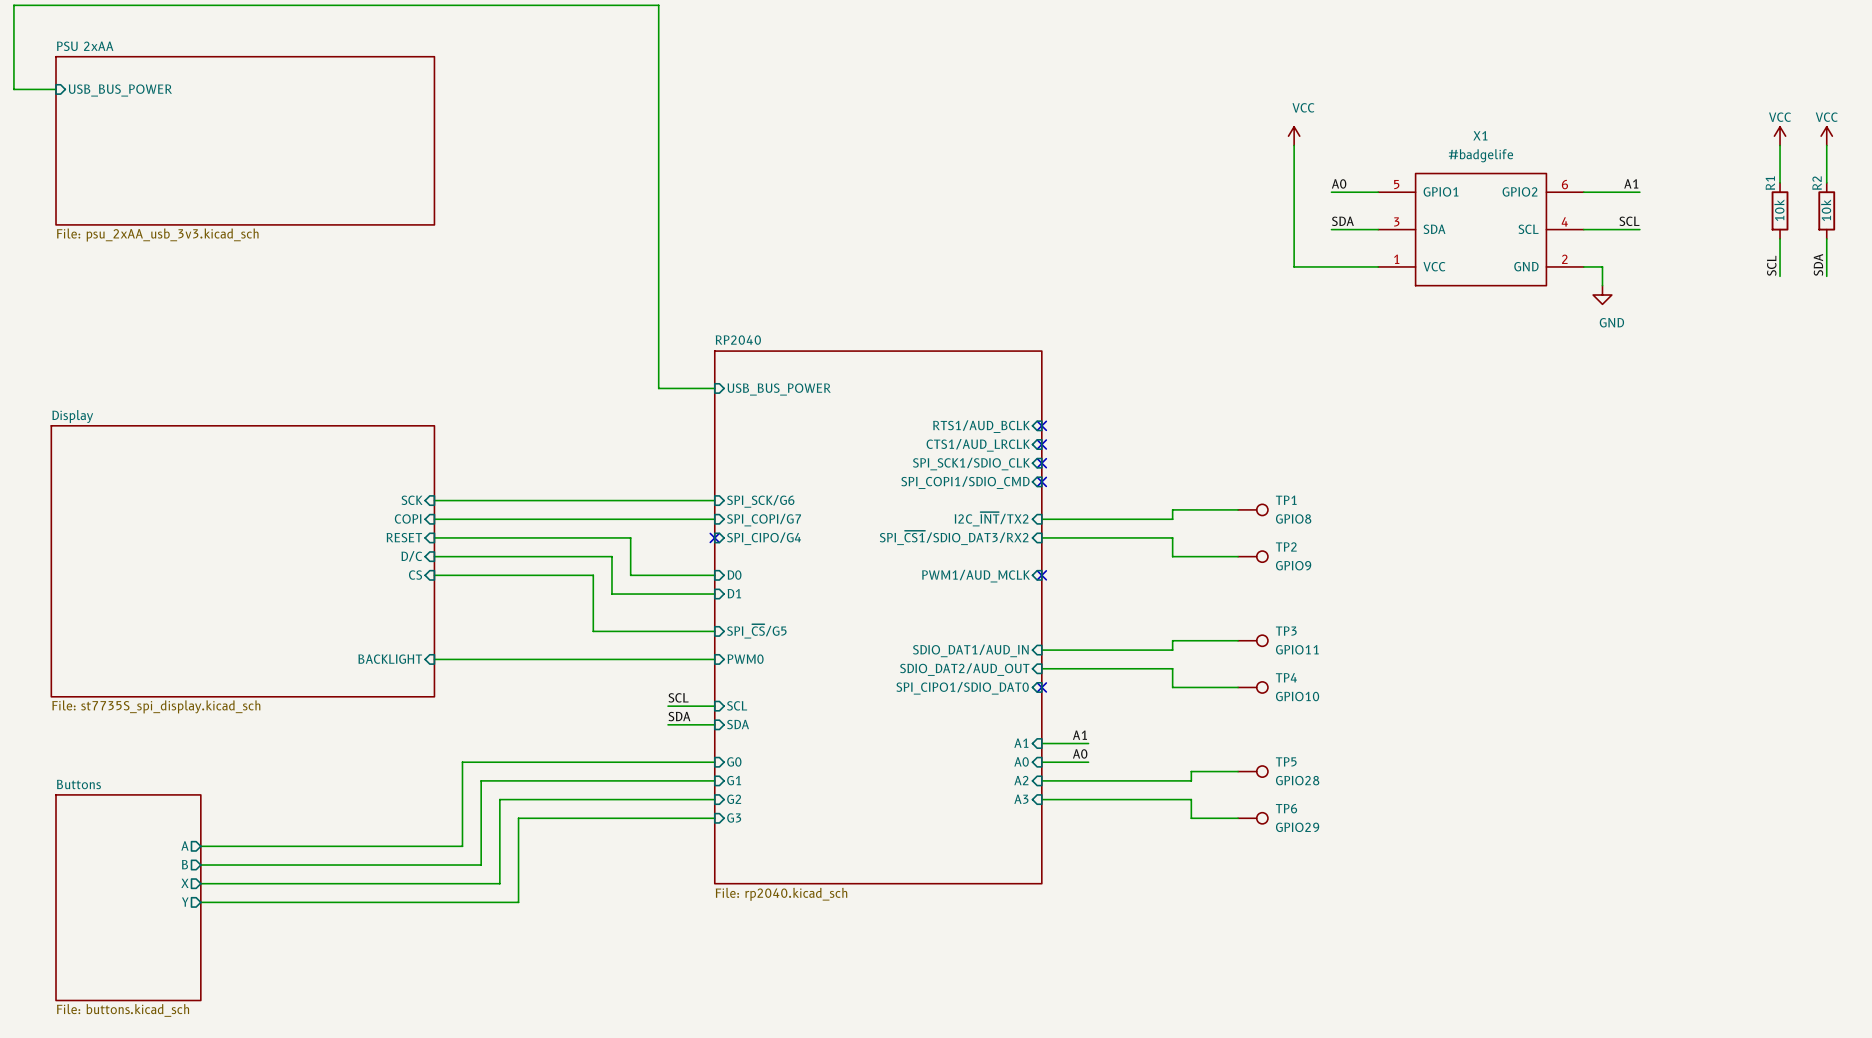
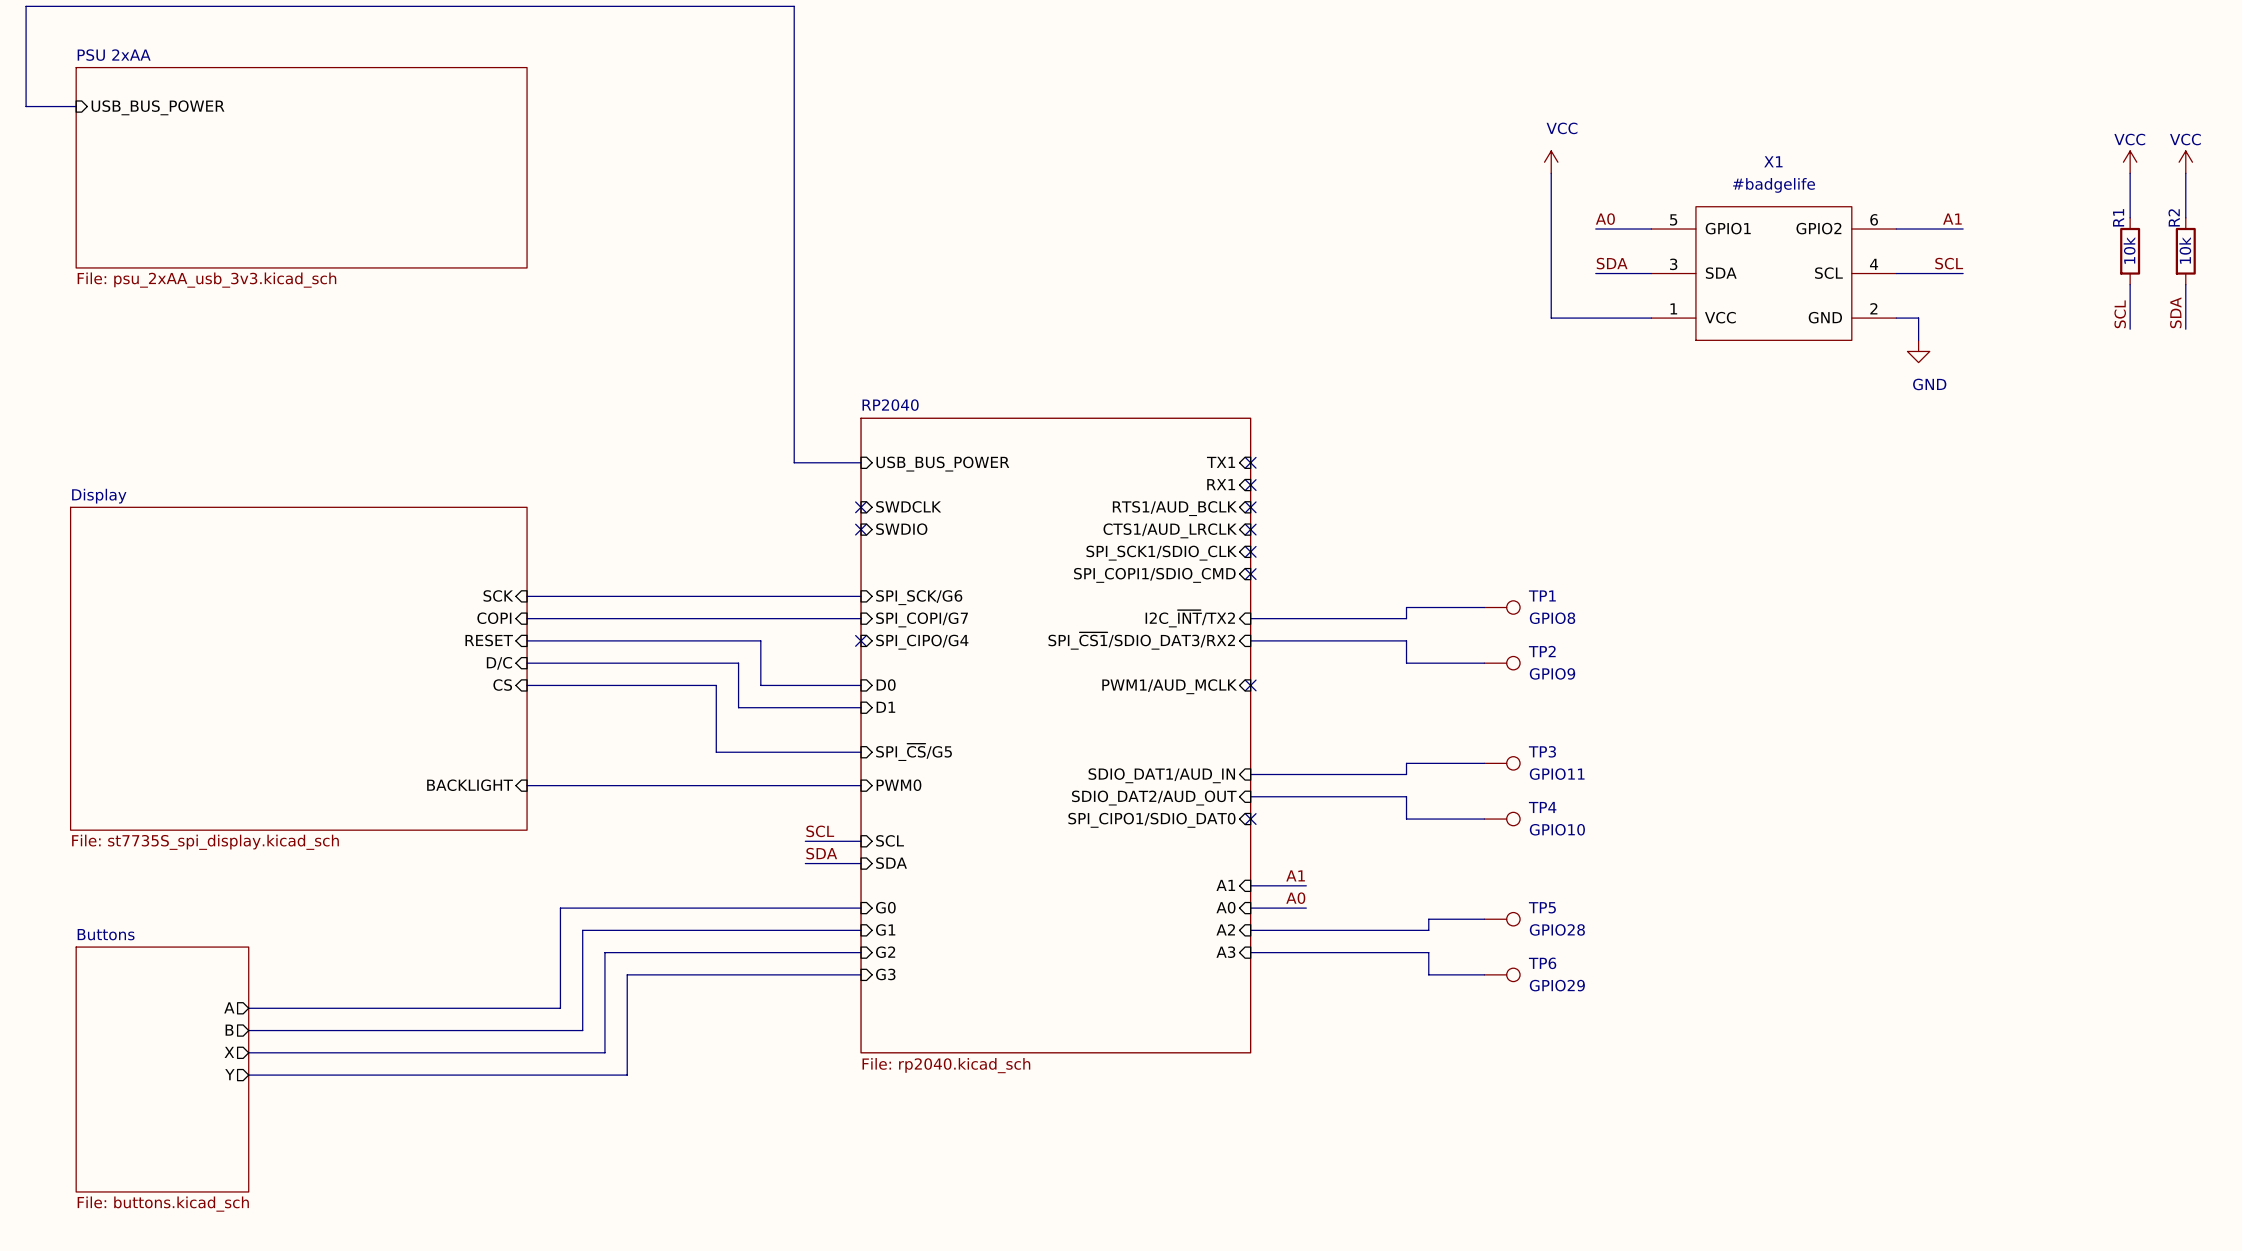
sheet pin: none -> TX1 (1221, 462)
no-connect mark: none -> (1250, 462)
sheet pin: none -> RX1 (1221, 484)
no-connect mark: none -> (1250, 485)
no-connect mark: none -> (861, 507)
sheet pin: none -> SWDCLK (908, 506)
no-connect mark: none -> (861, 529)
sheet pin: none -> SWDIO (901, 529)

